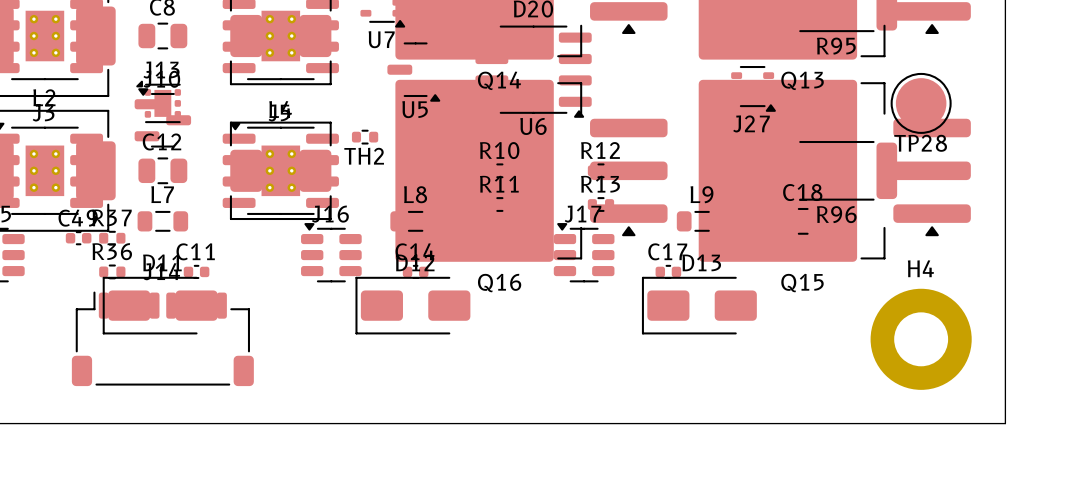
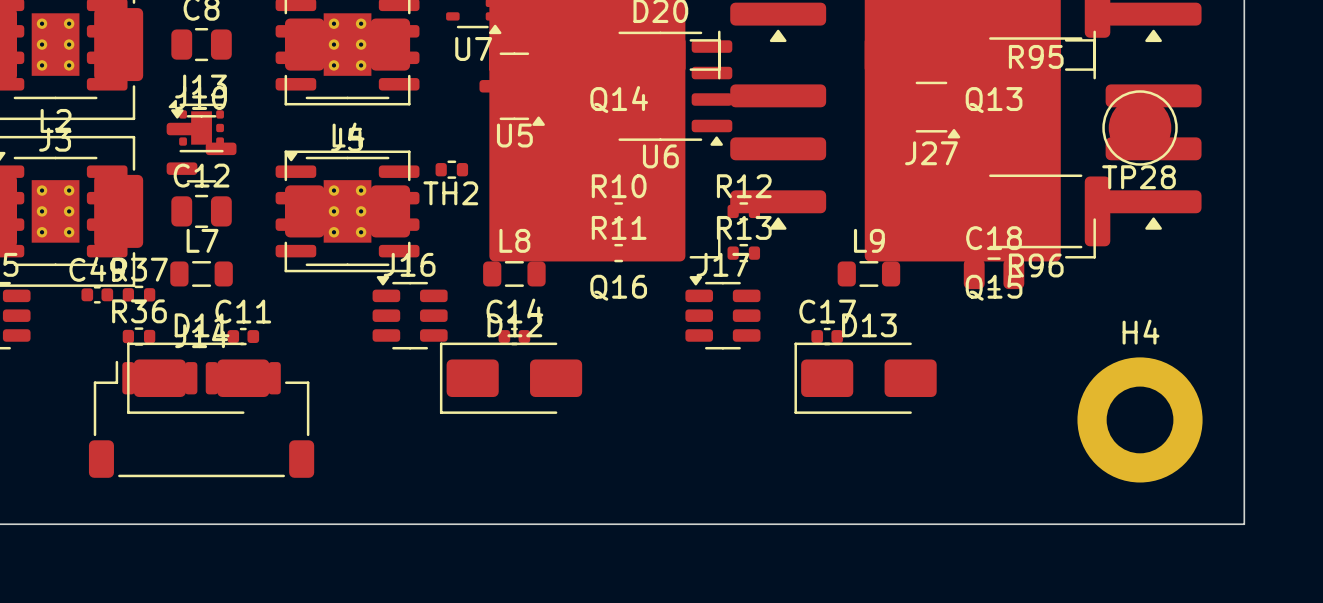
Q16 position: (531, 170) -> (657, 148)
Q15 position: (834, 170) -> (1033, 148)

